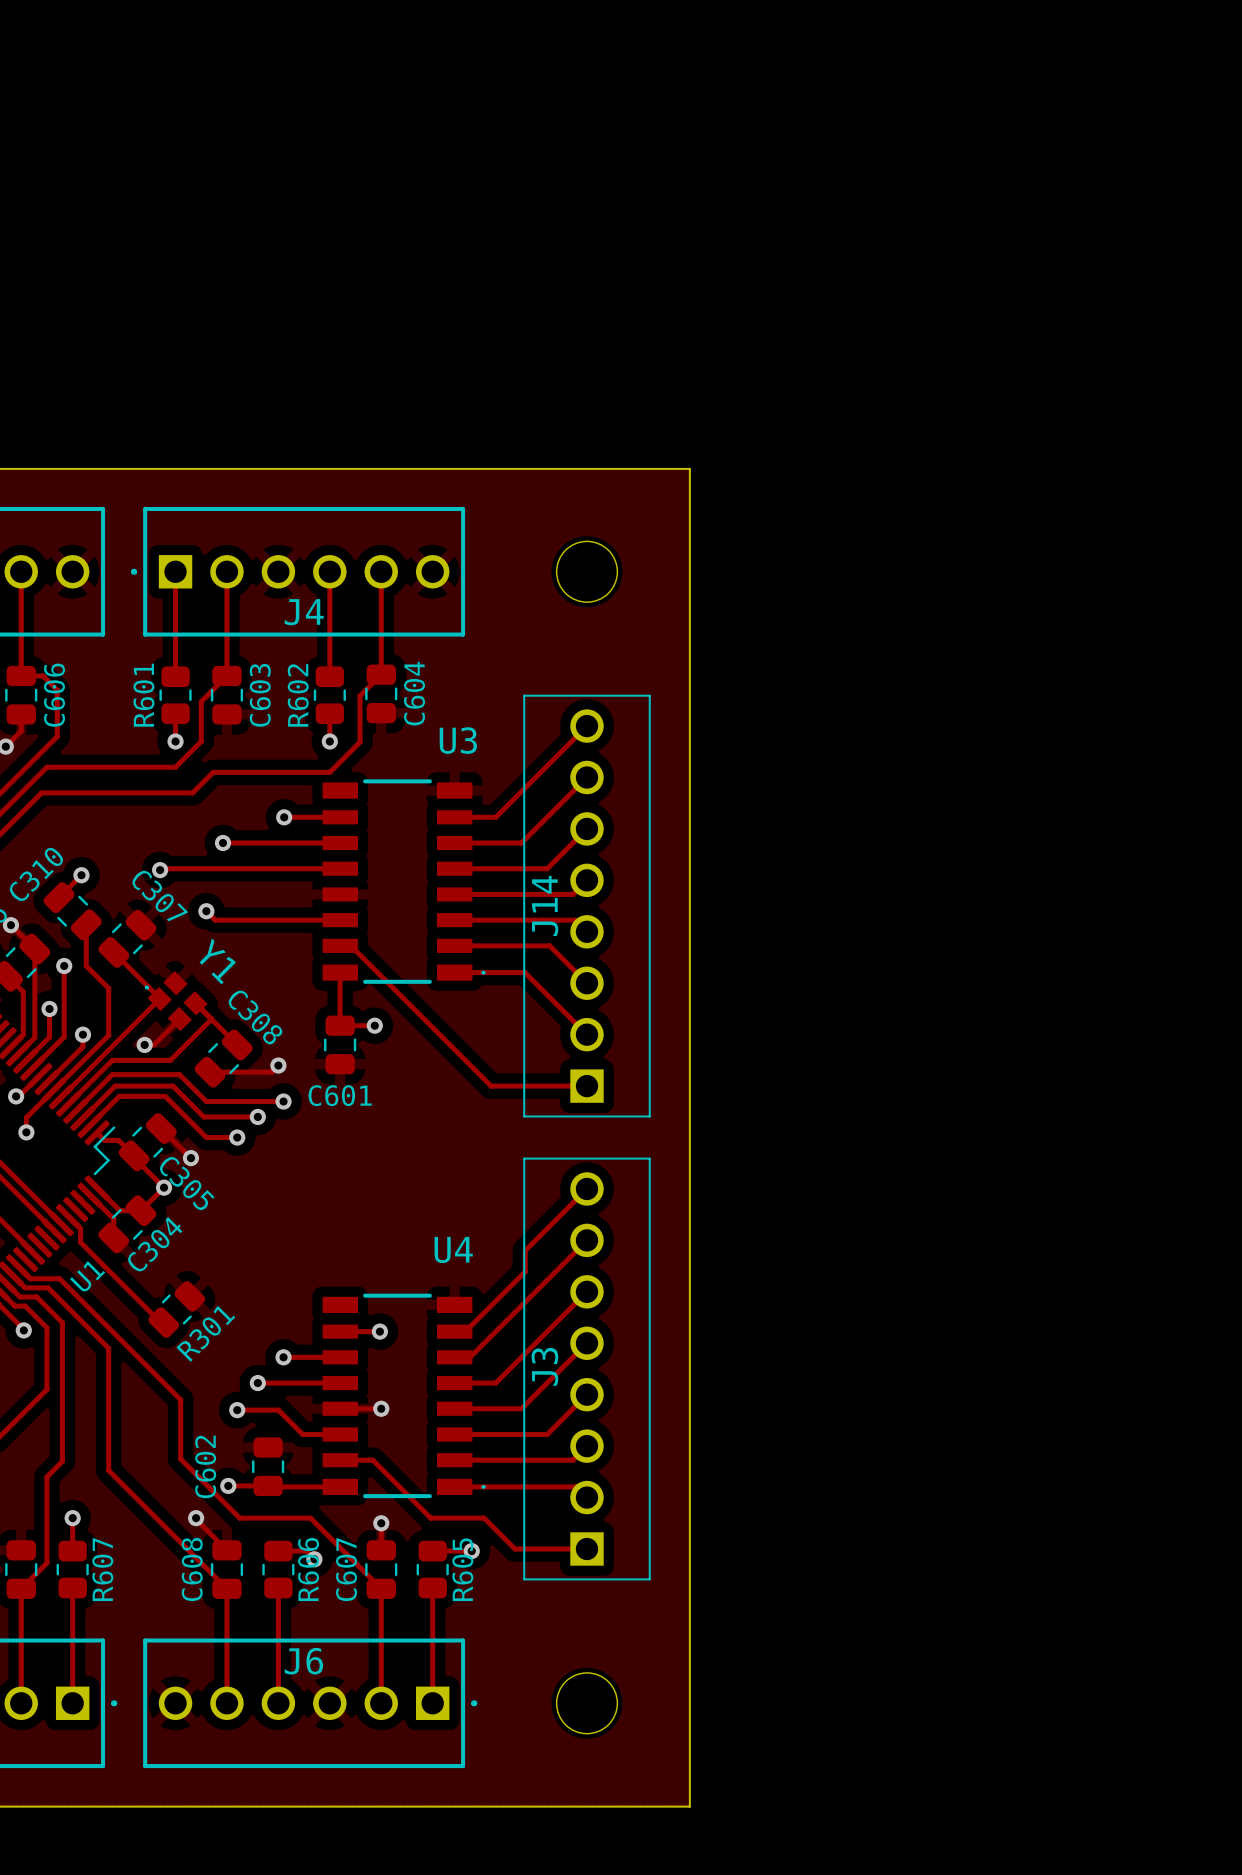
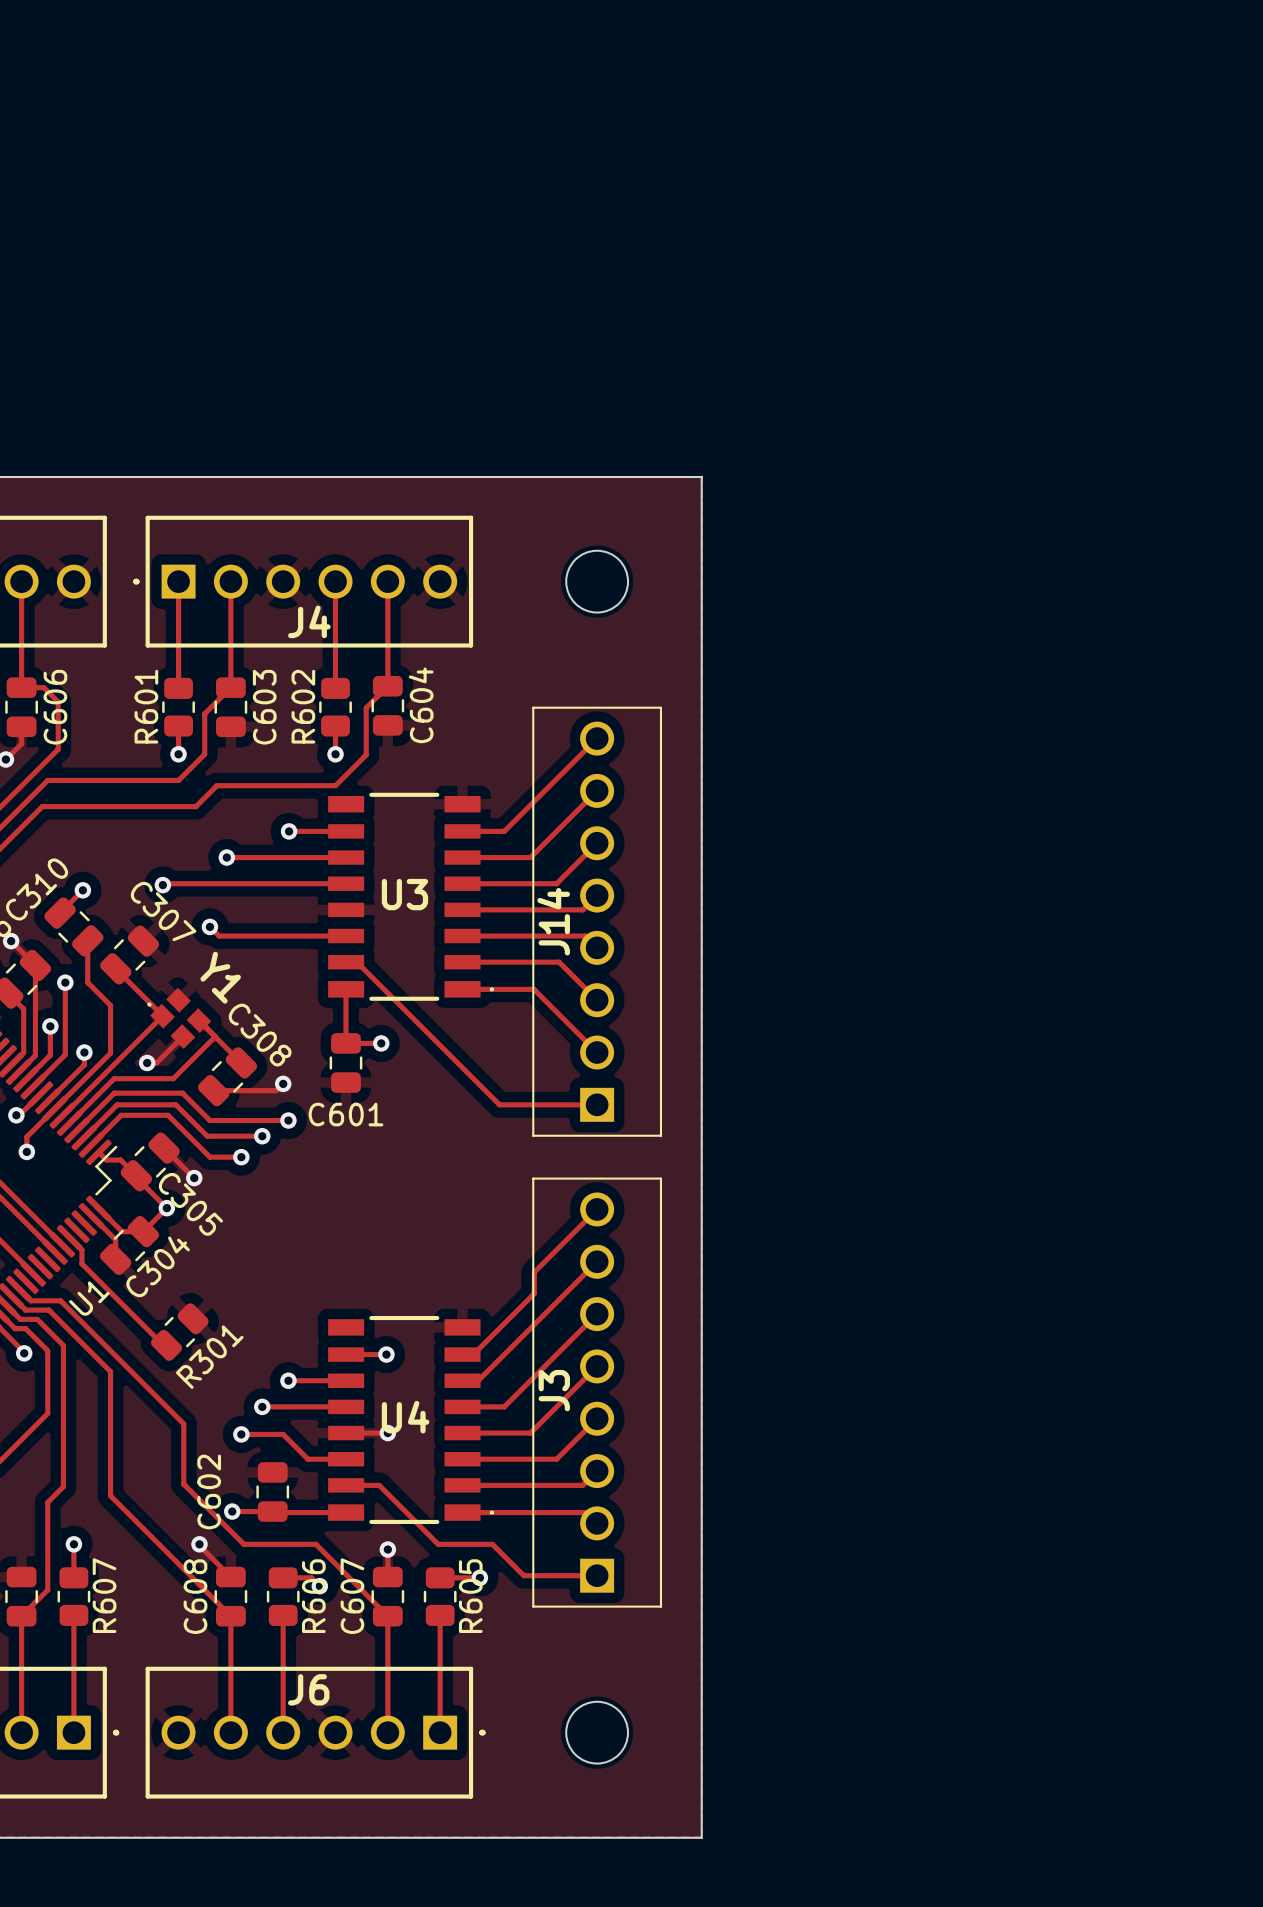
U3 name position: U3 (458, 740) -> U3 (404, 894)
U4 name position: U4 (453, 1249) -> U4 (405, 1417)

